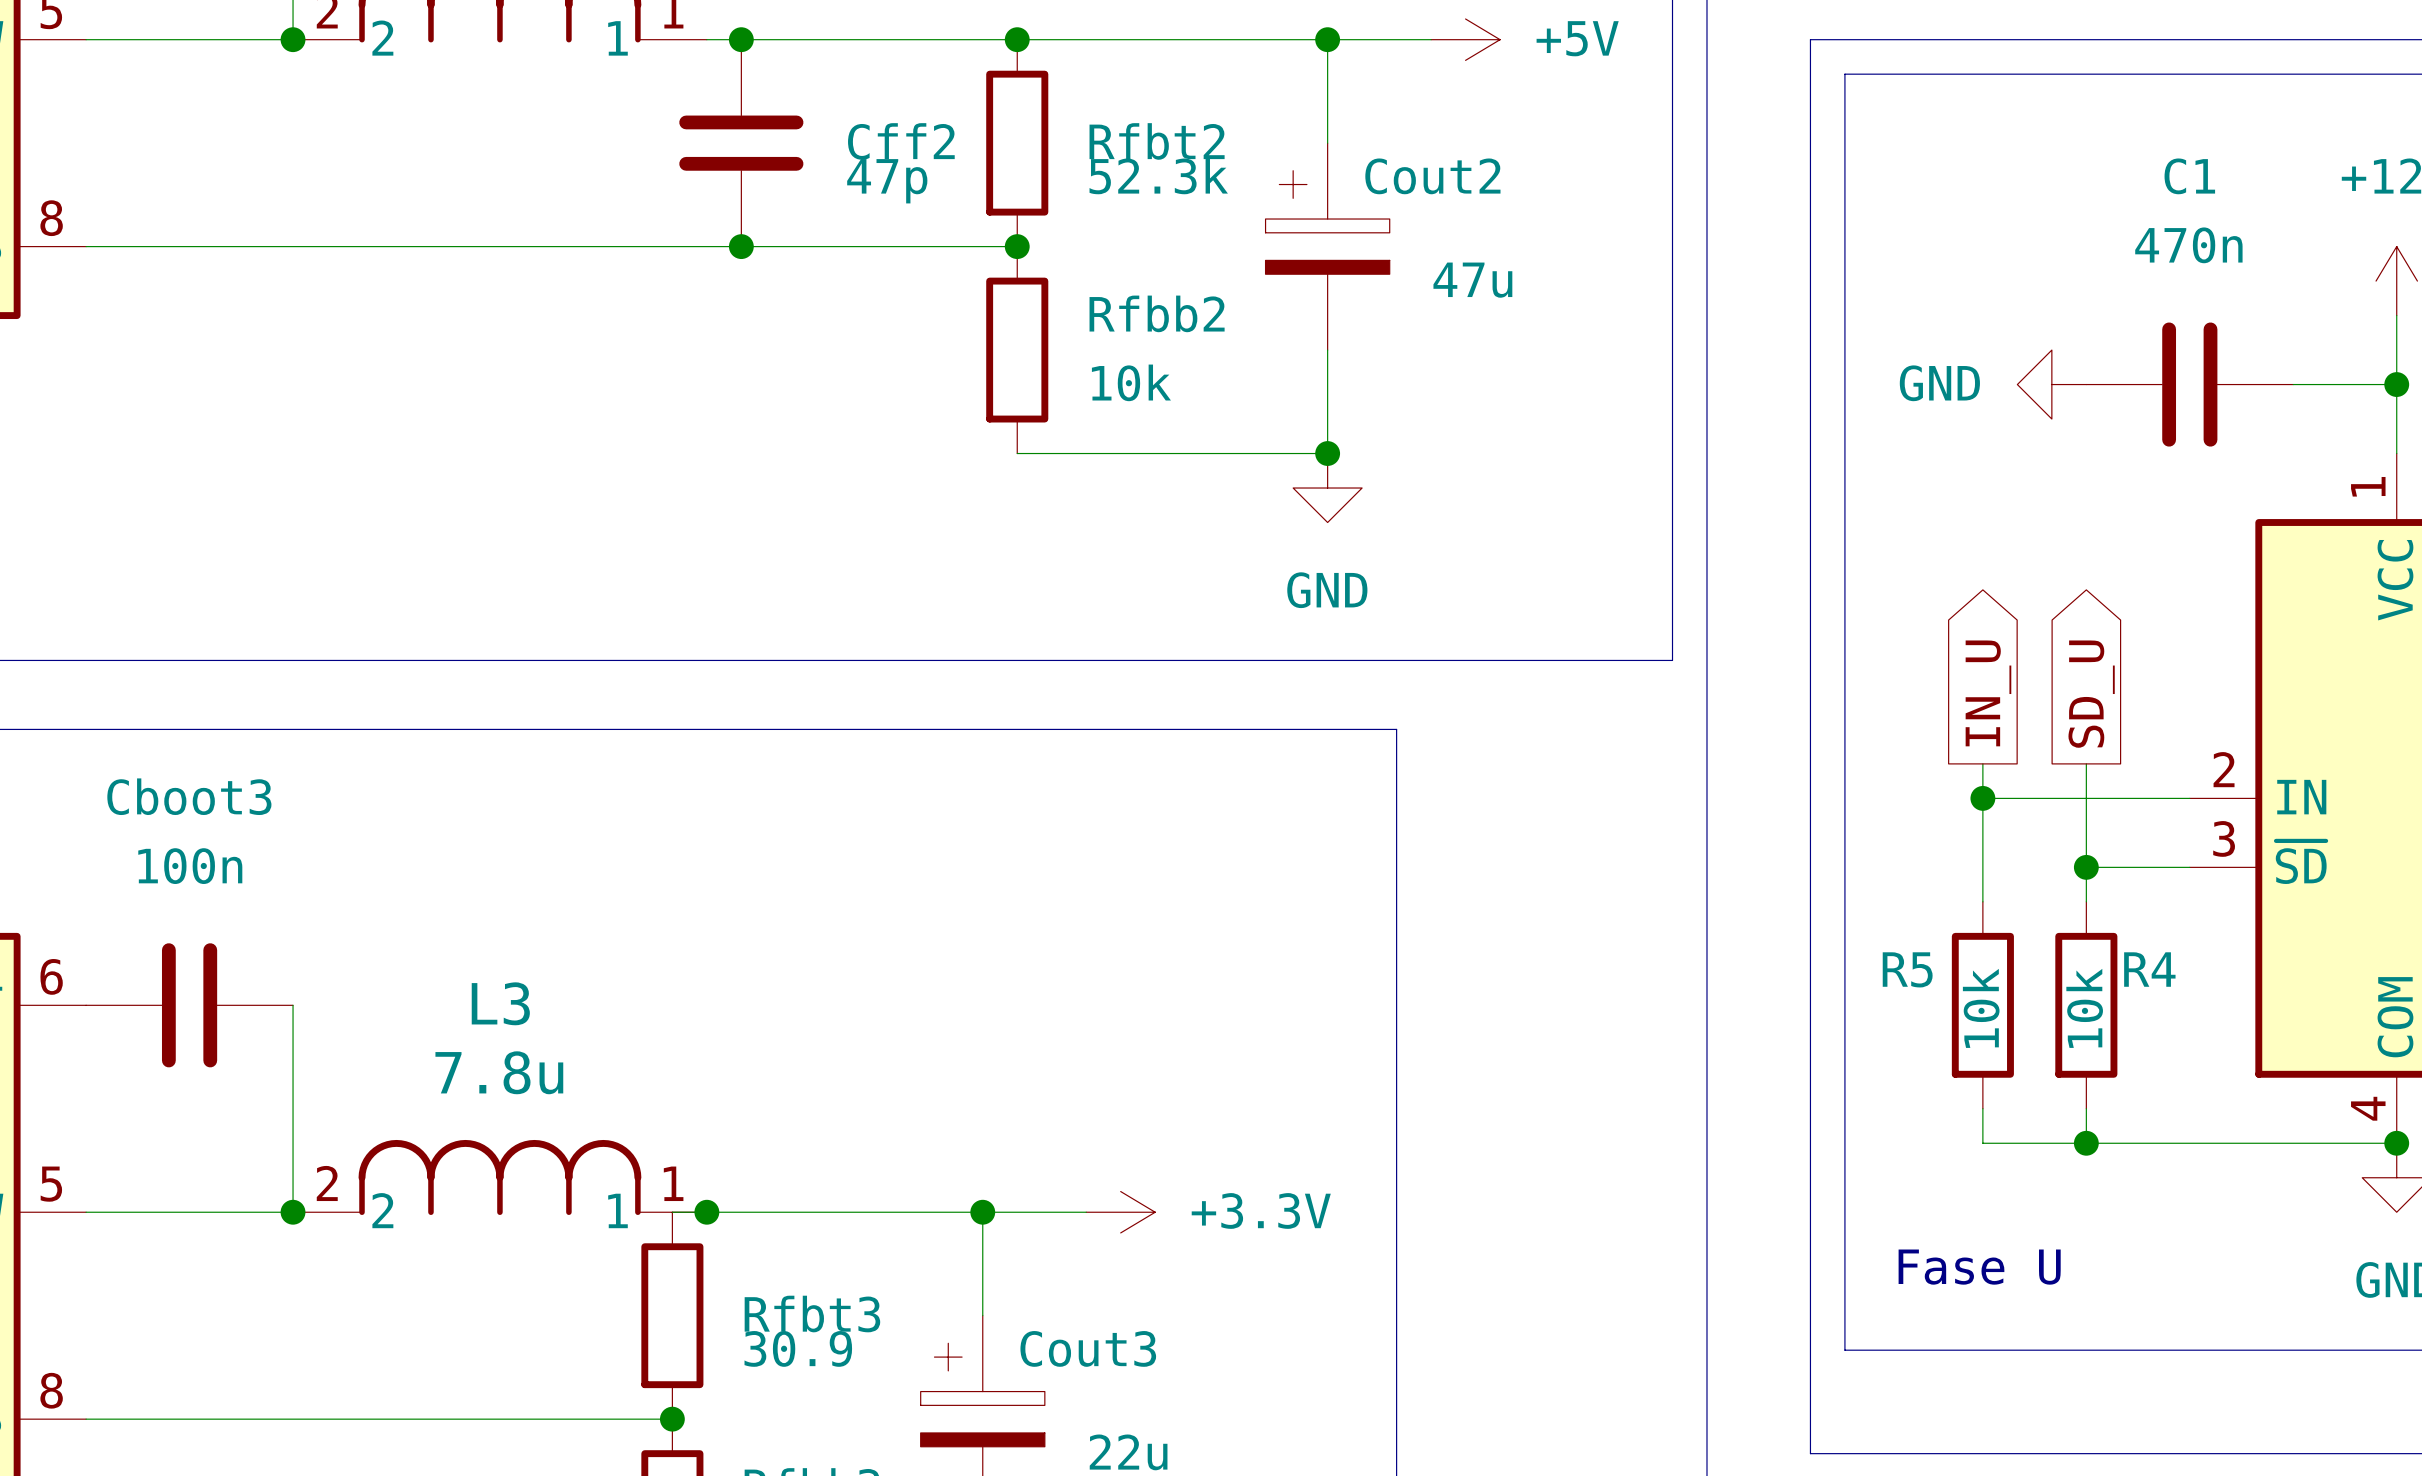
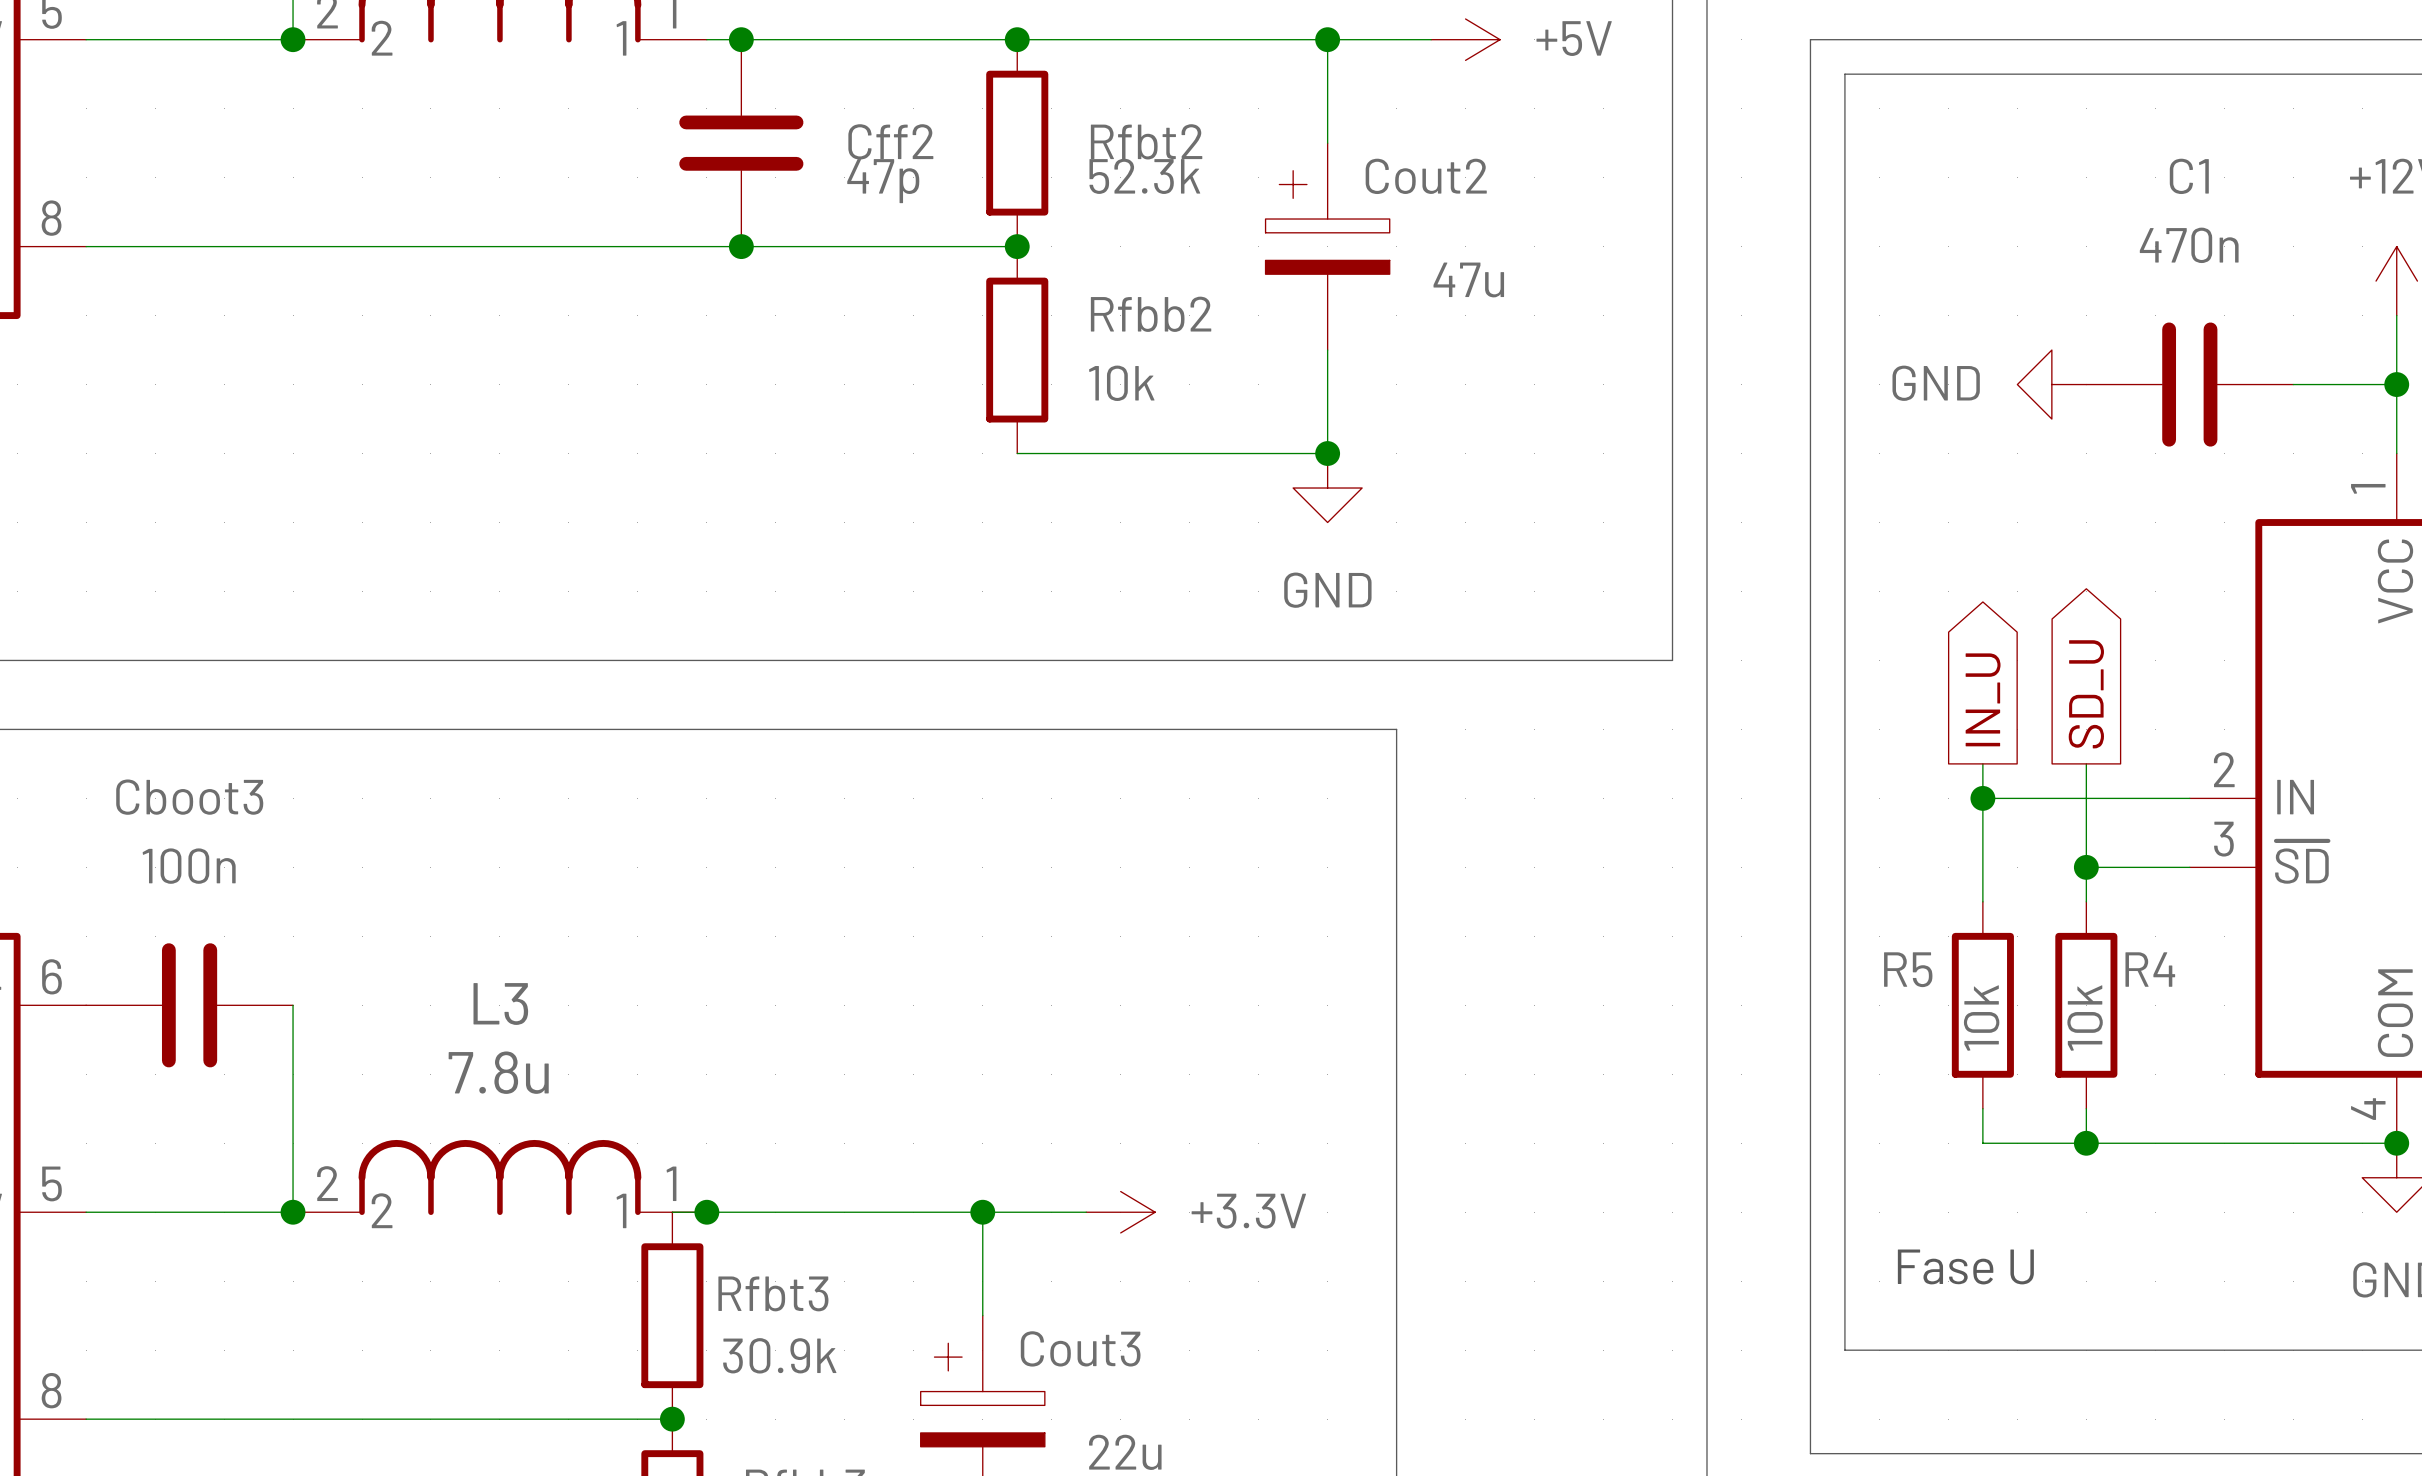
Rfbt3 name position: Rfbt3 (812, 1314) -> Rfbt3 (773, 1293)
Rfbt3 value: 30.9 (798, 1348) -> 30.9k (779, 1355)

